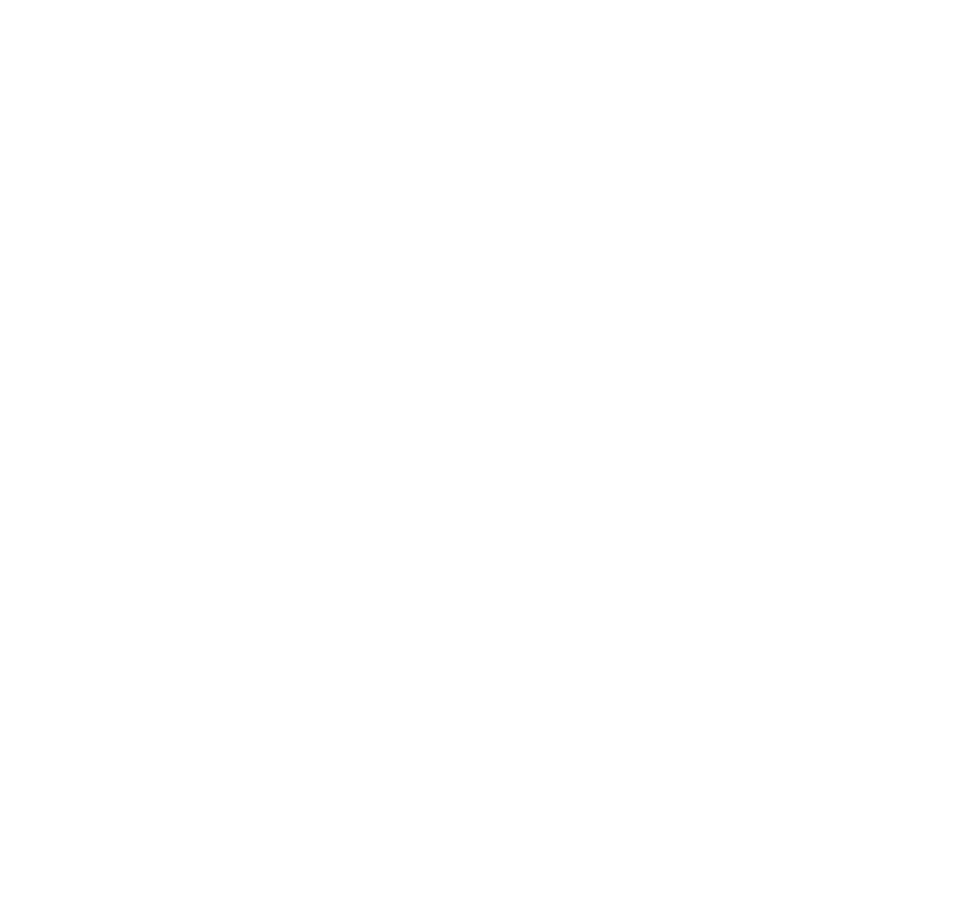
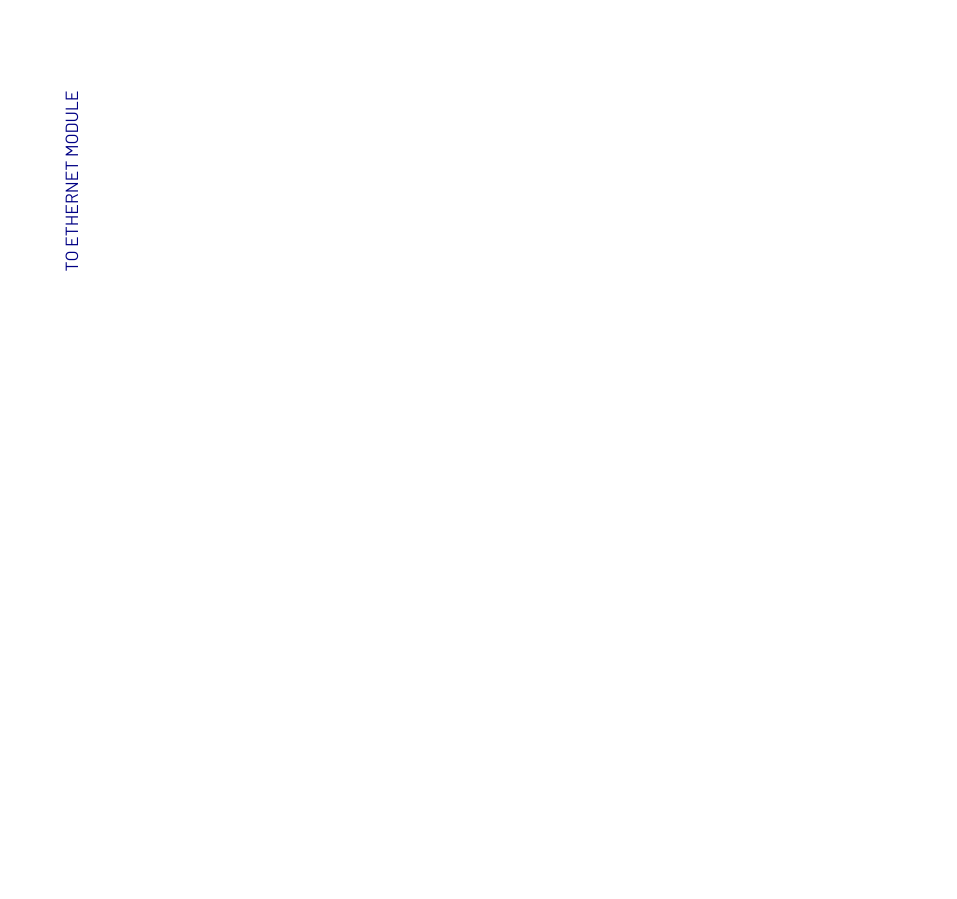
text: none -> TO ETHERNET MODULE (71, 181)

